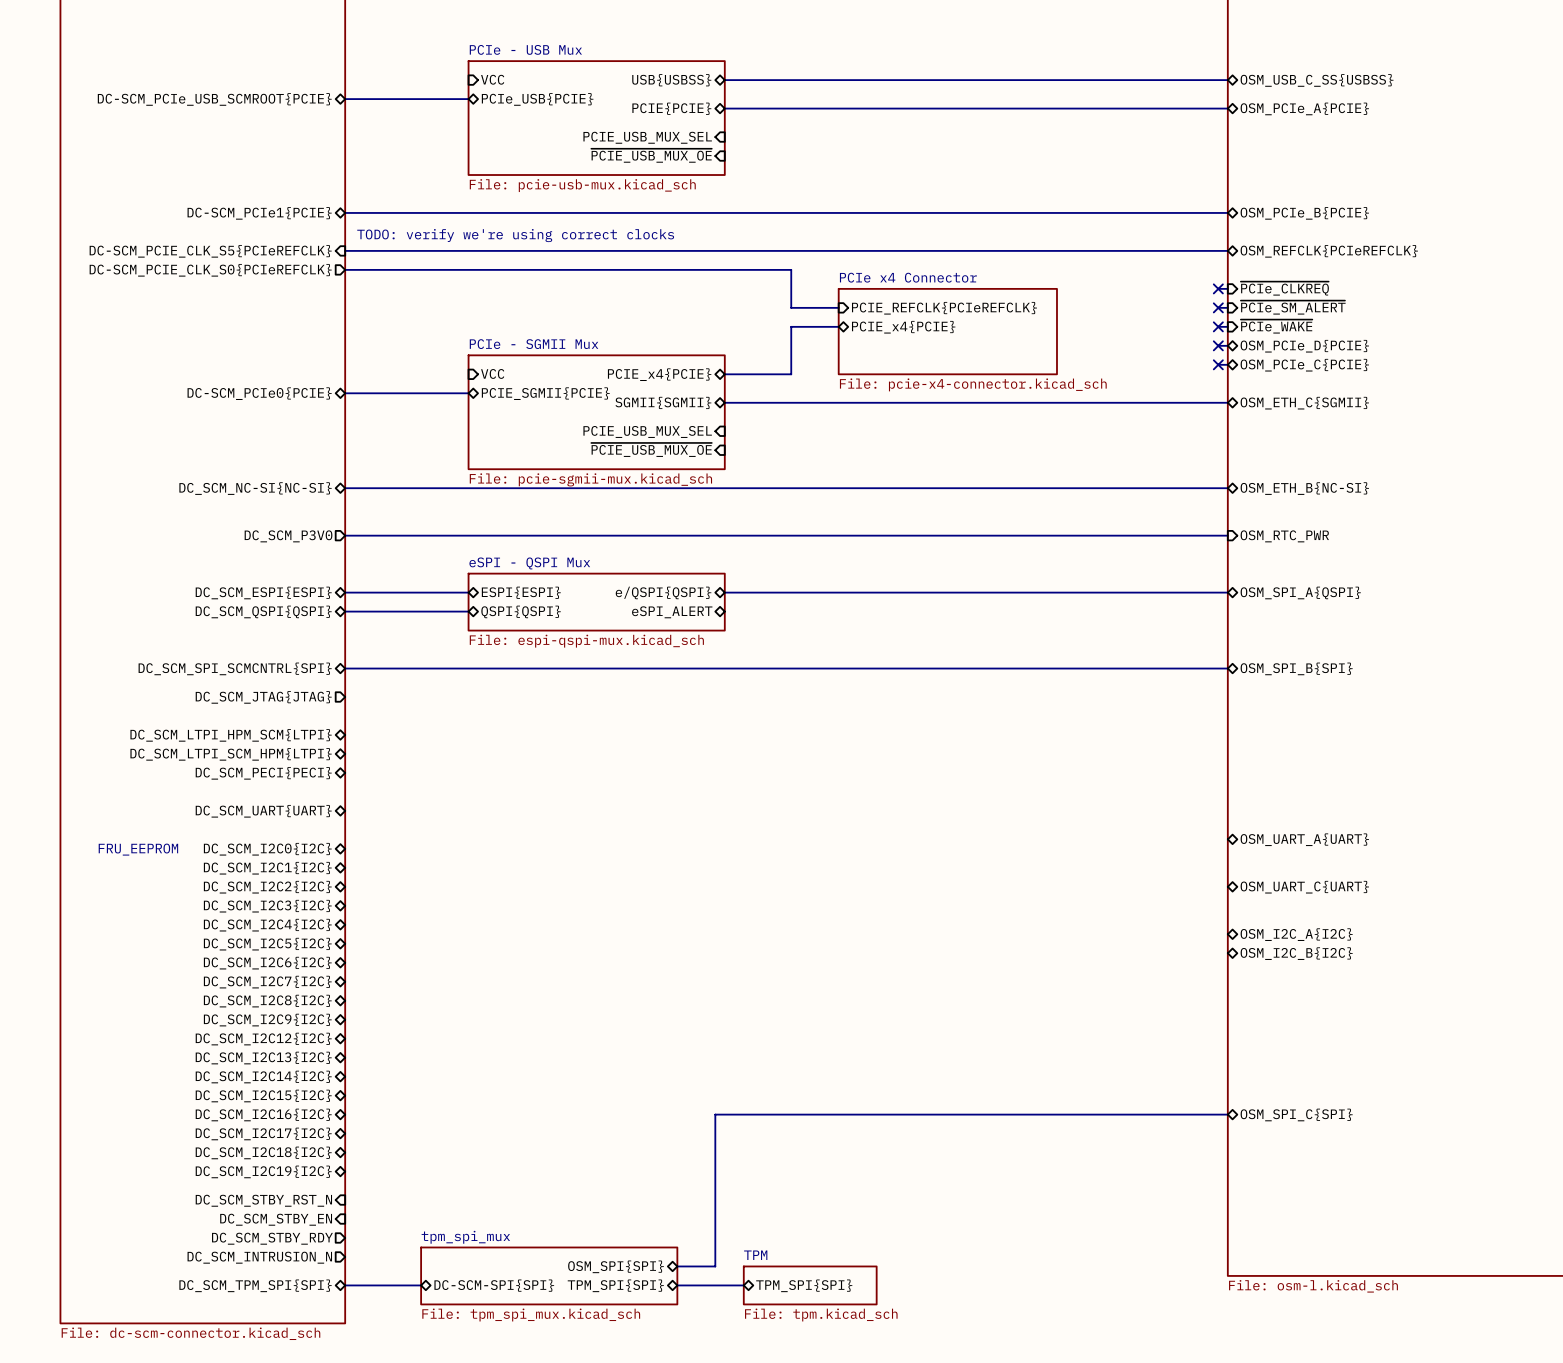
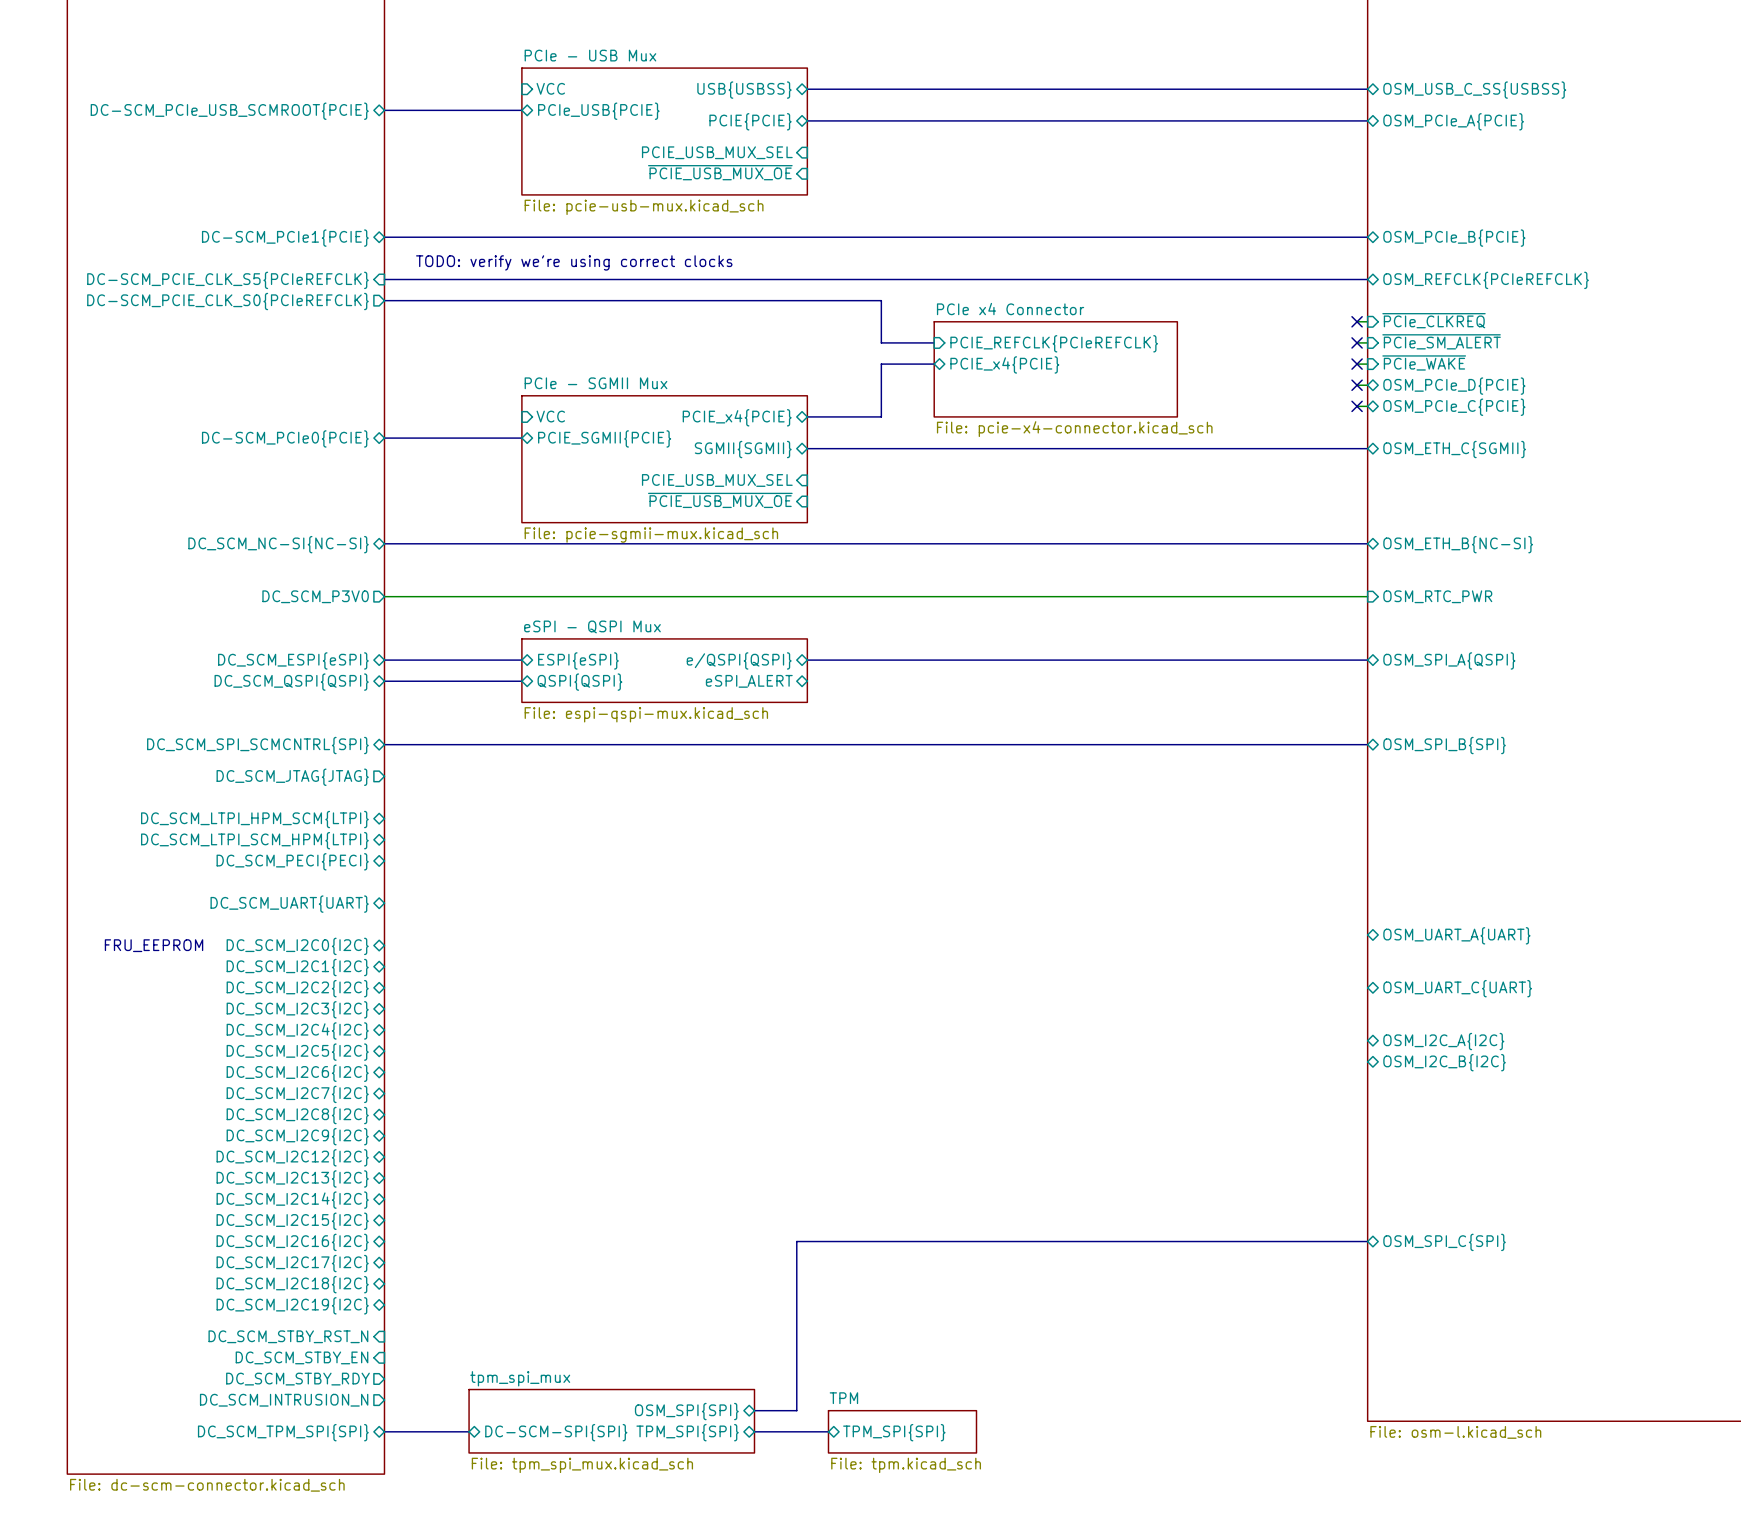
sheet pin: DC_SCM_ESPI{ESPI} (263, 592) -> DC_SCM_ESPI{eSPI} (293, 660)
sheet pin: ESPI{ESPI} (521, 592) -> ESPI{eSPI} (578, 660)

